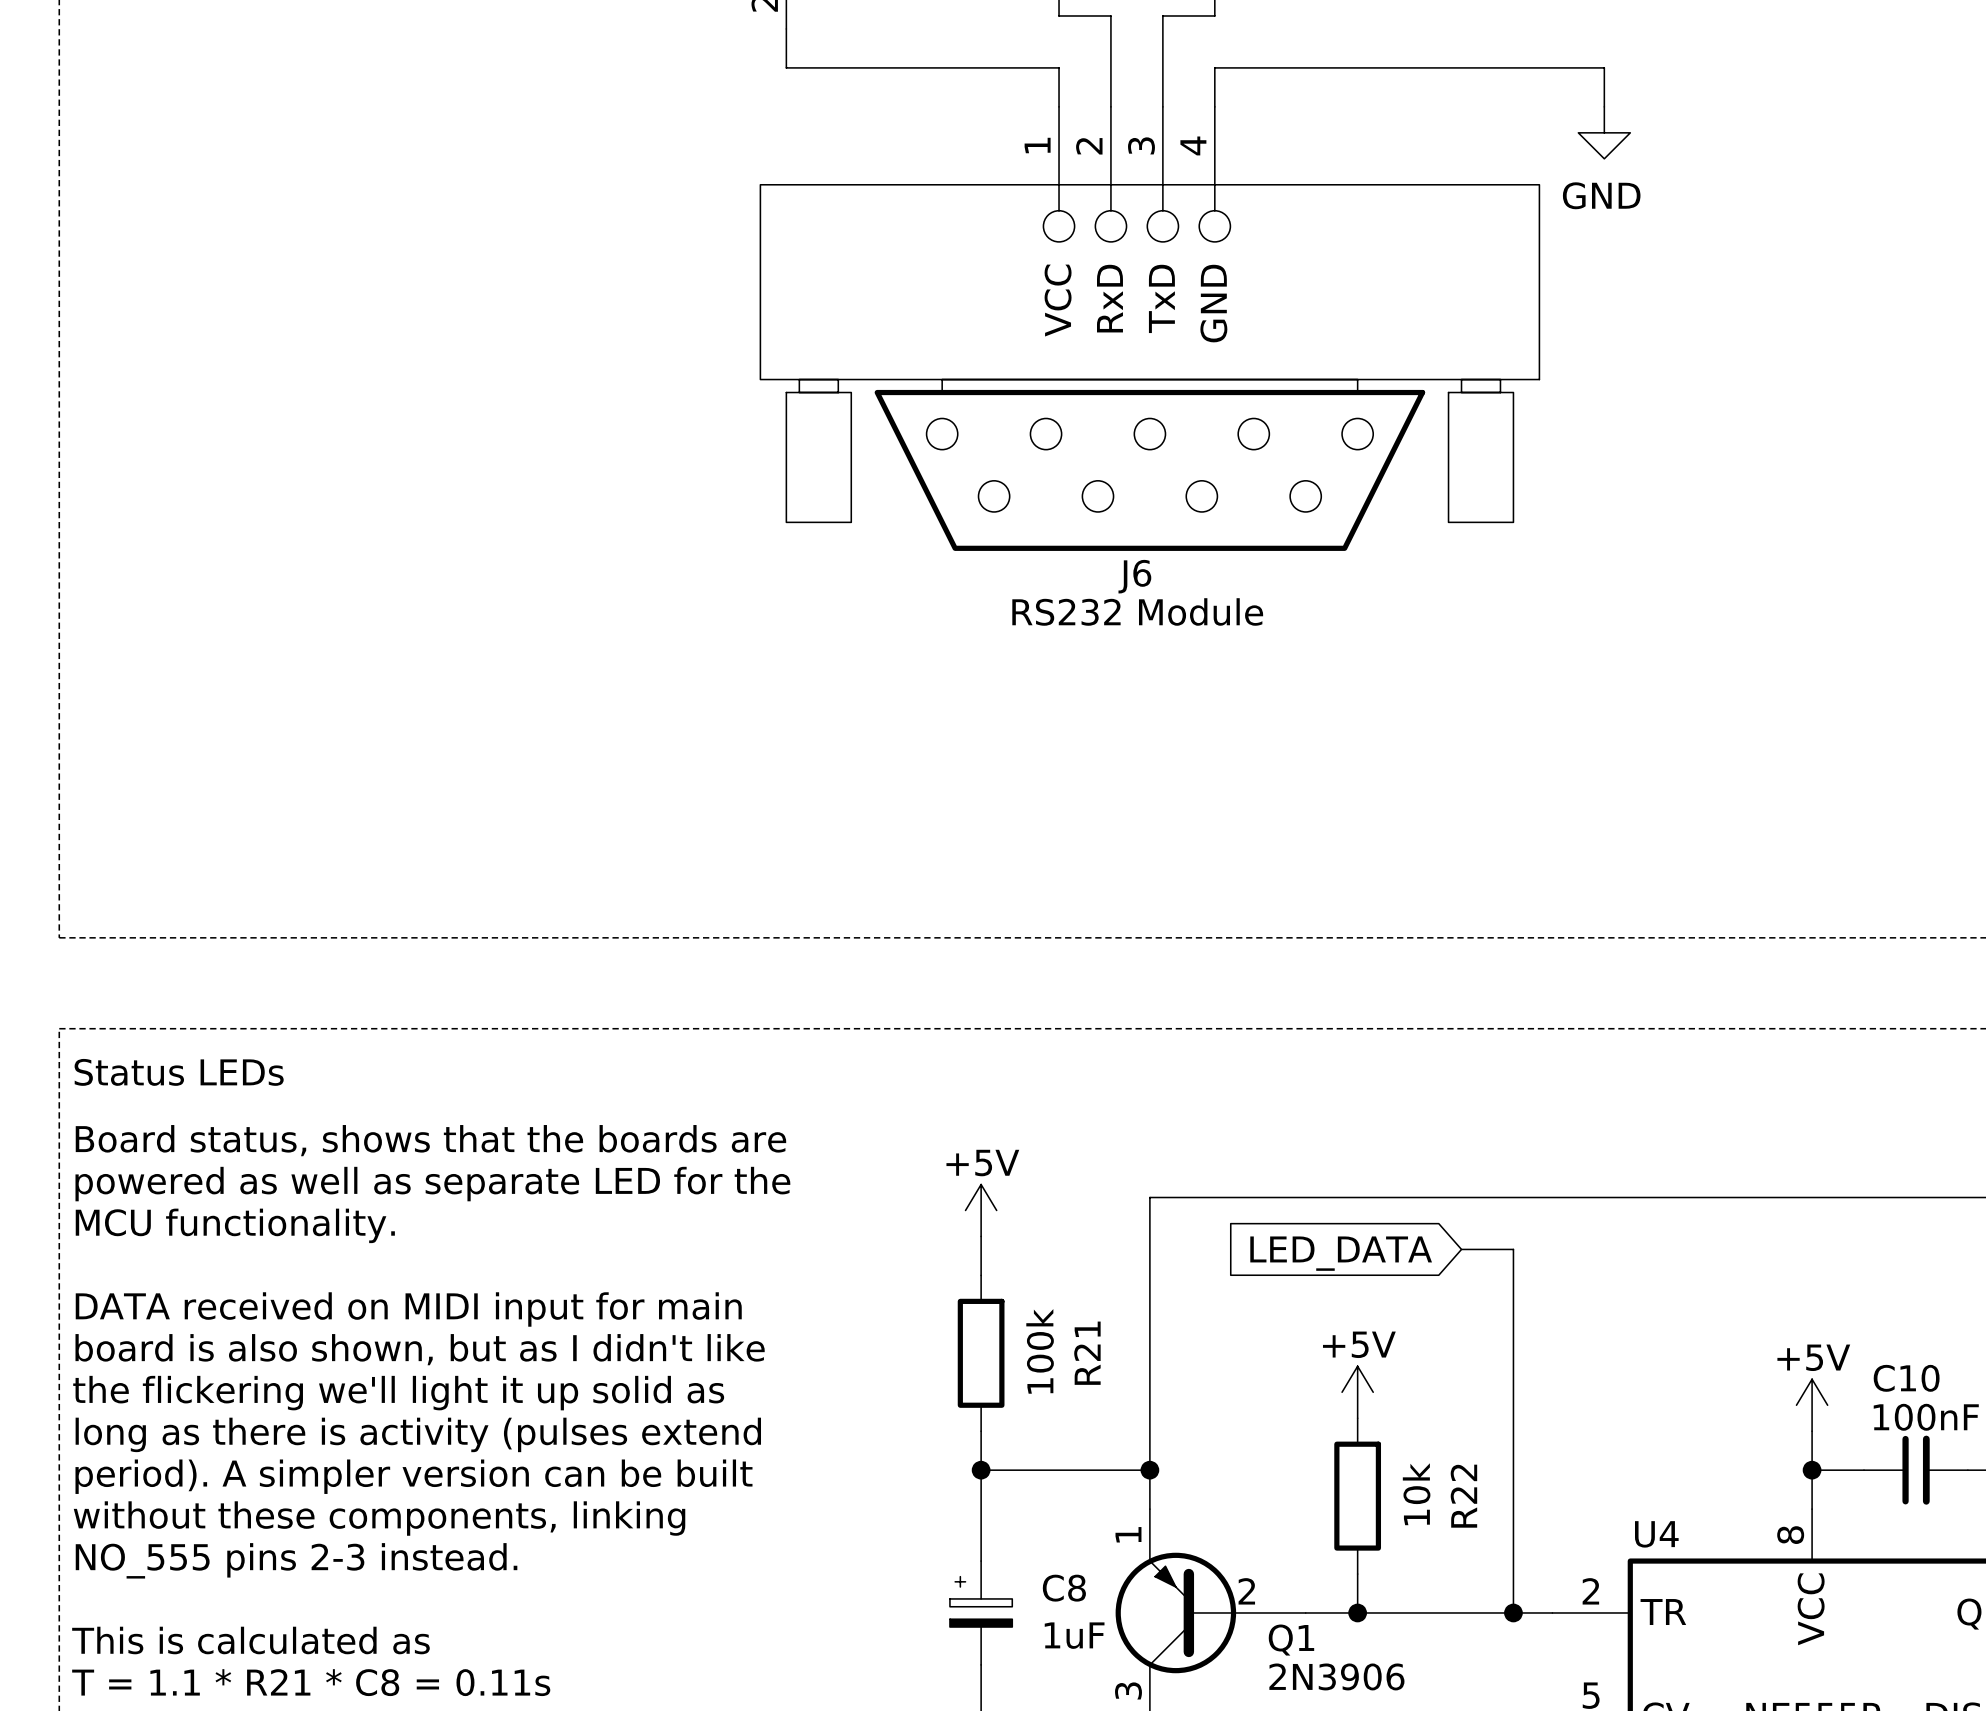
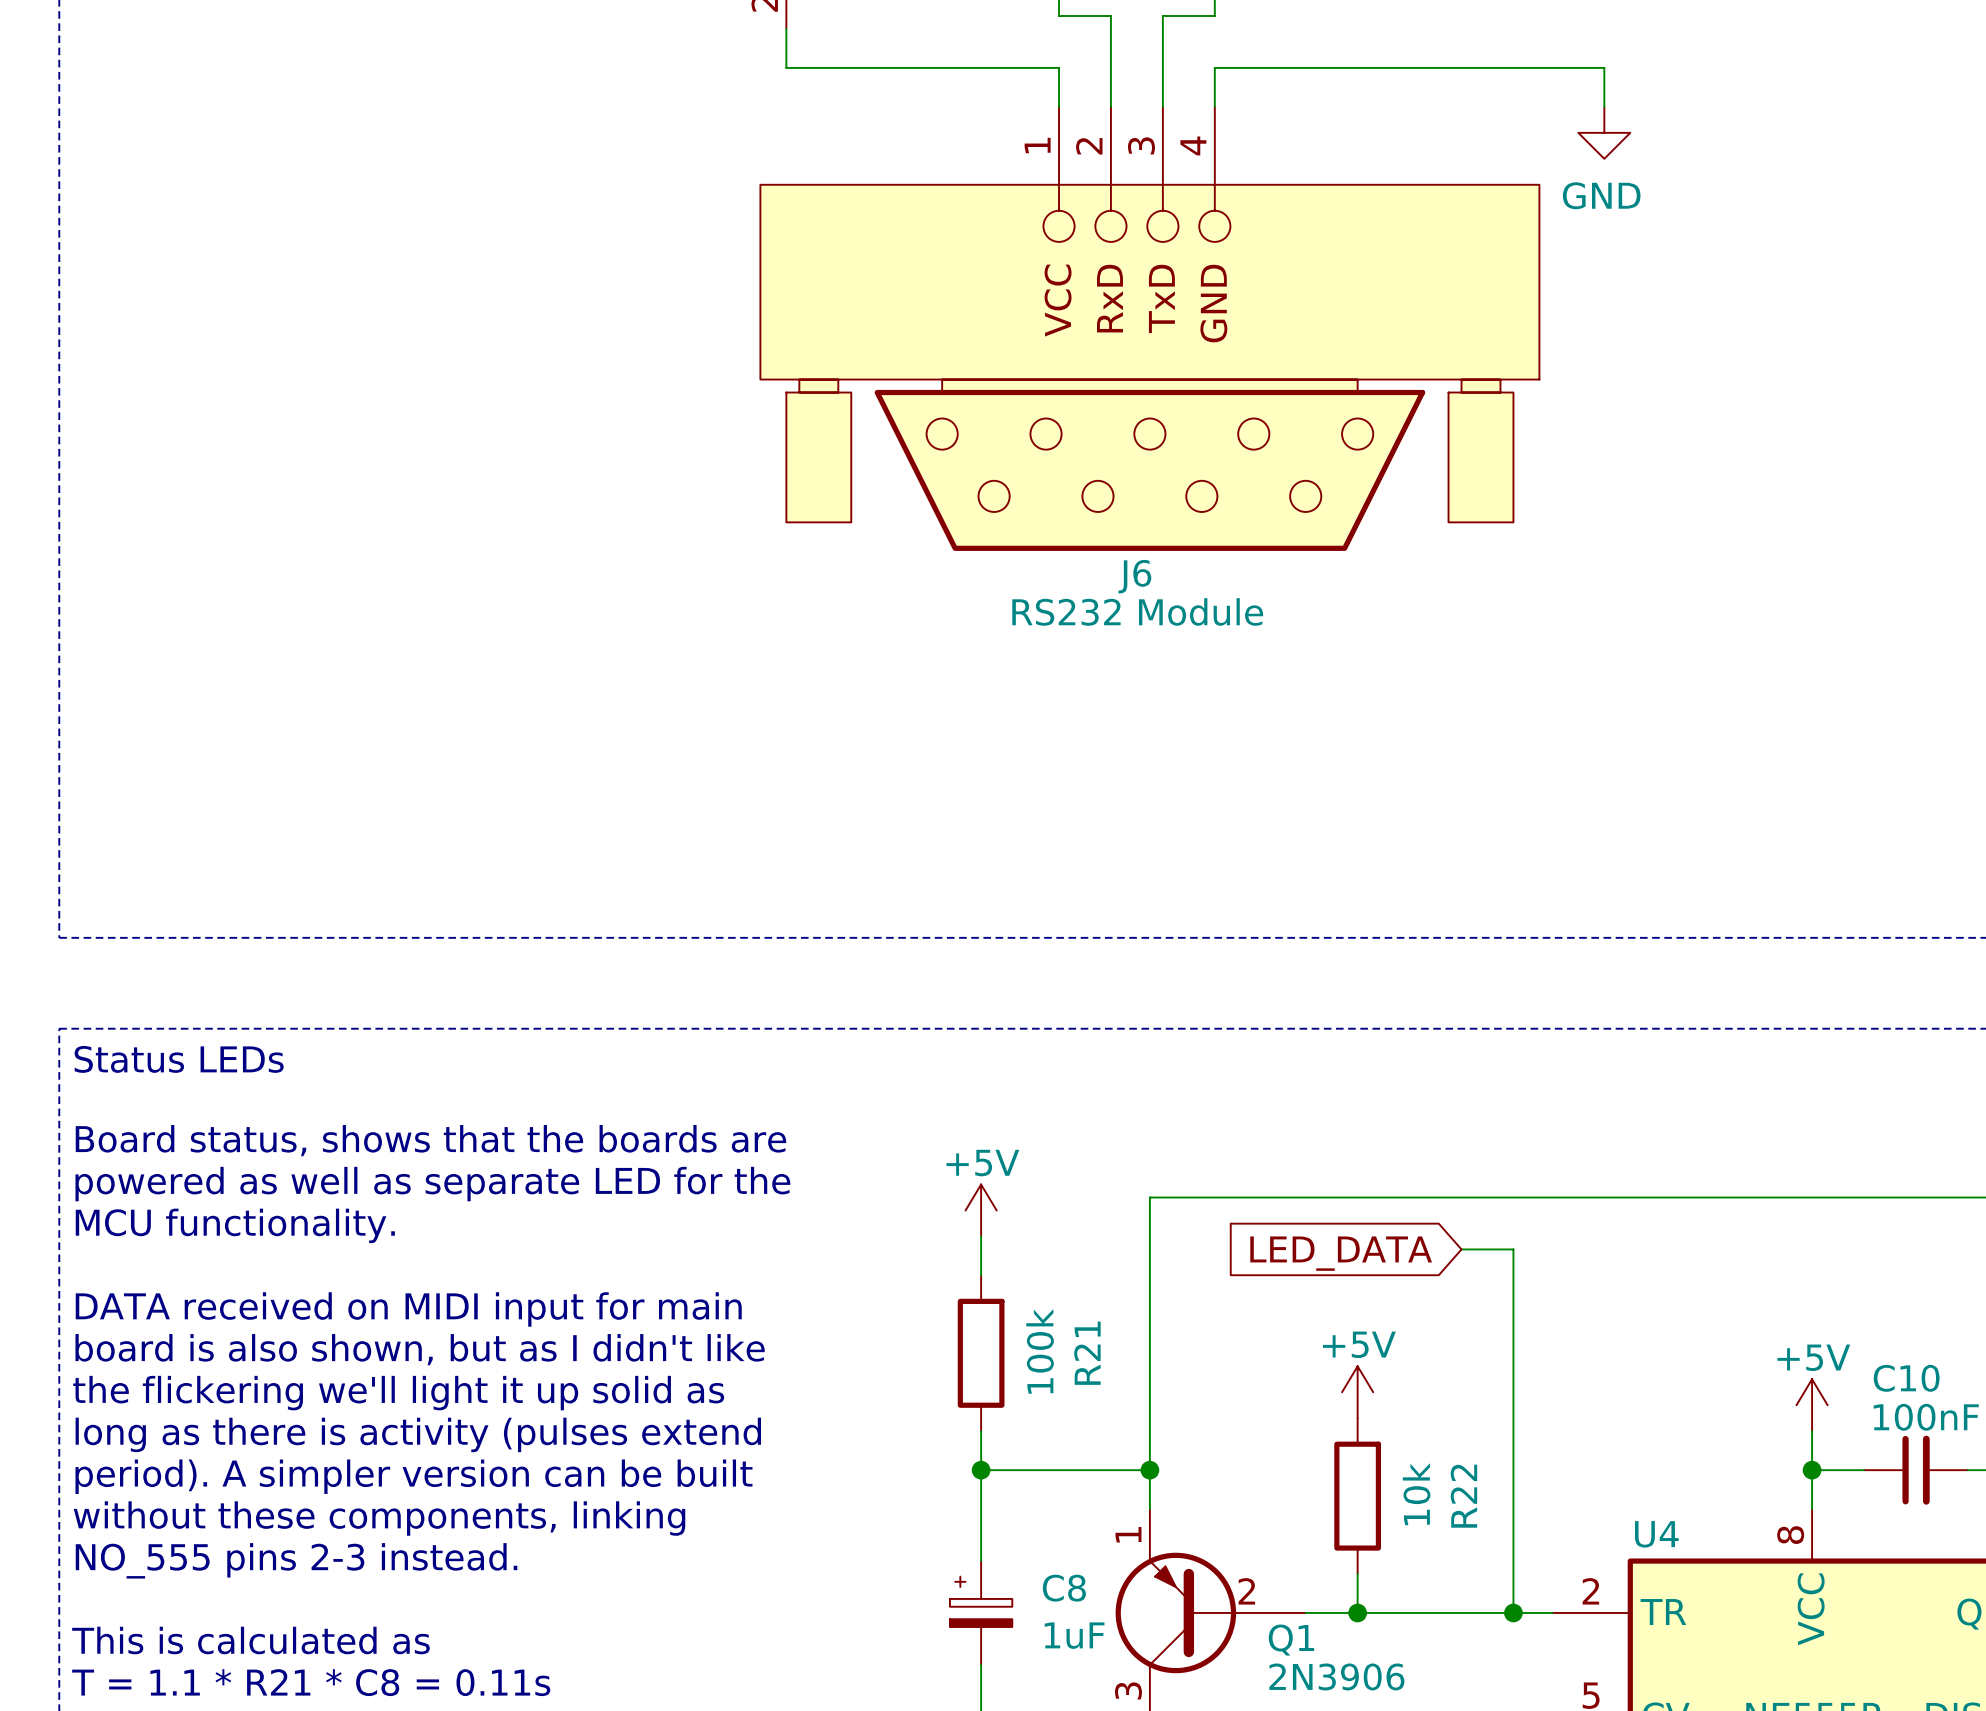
text position: Status LEDs (179, 1072) -> Status LEDs (179, 1059)

